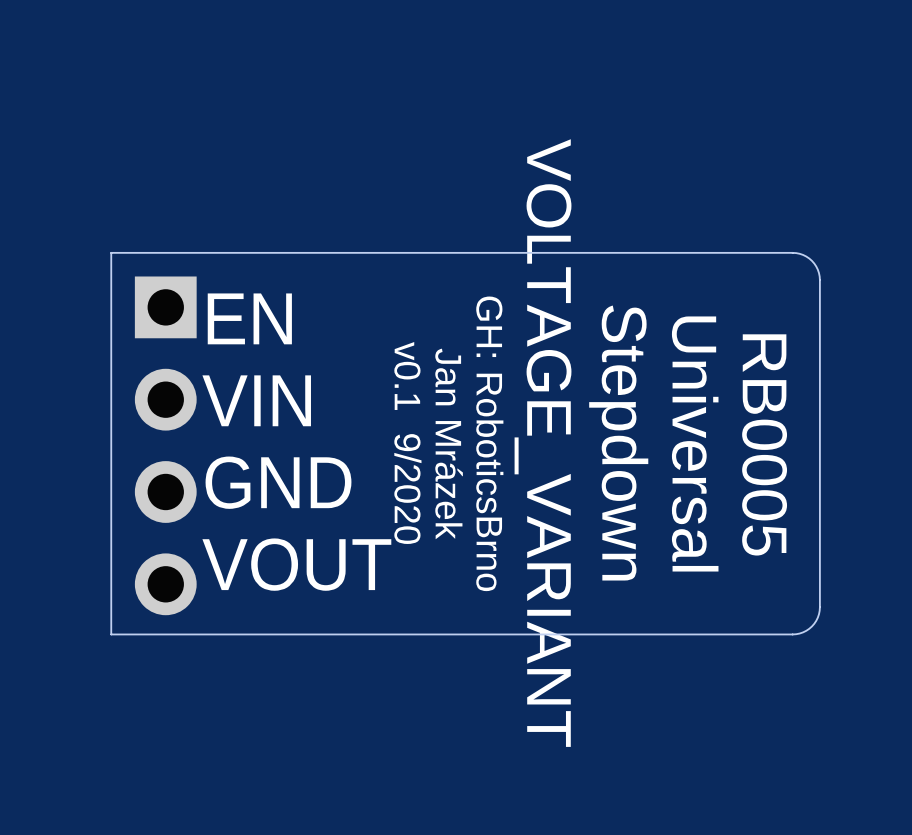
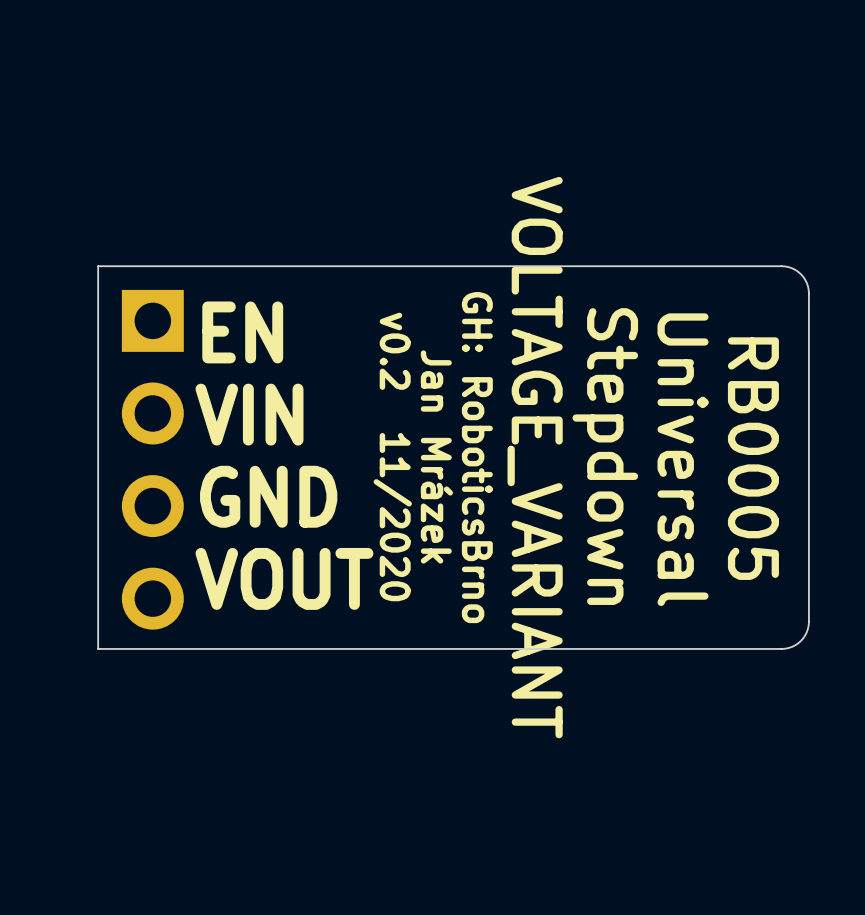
text: v0.1 9/2020 (407, 443) -> v0.2 11/2020 (392, 456)

